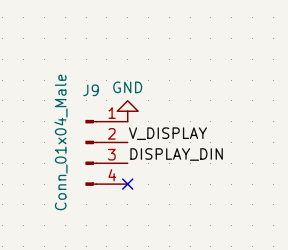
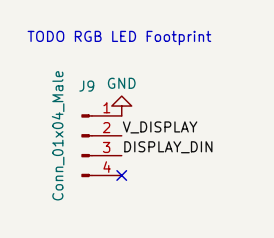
text: none -> TODO RGB LED Footprint (119, 38)

